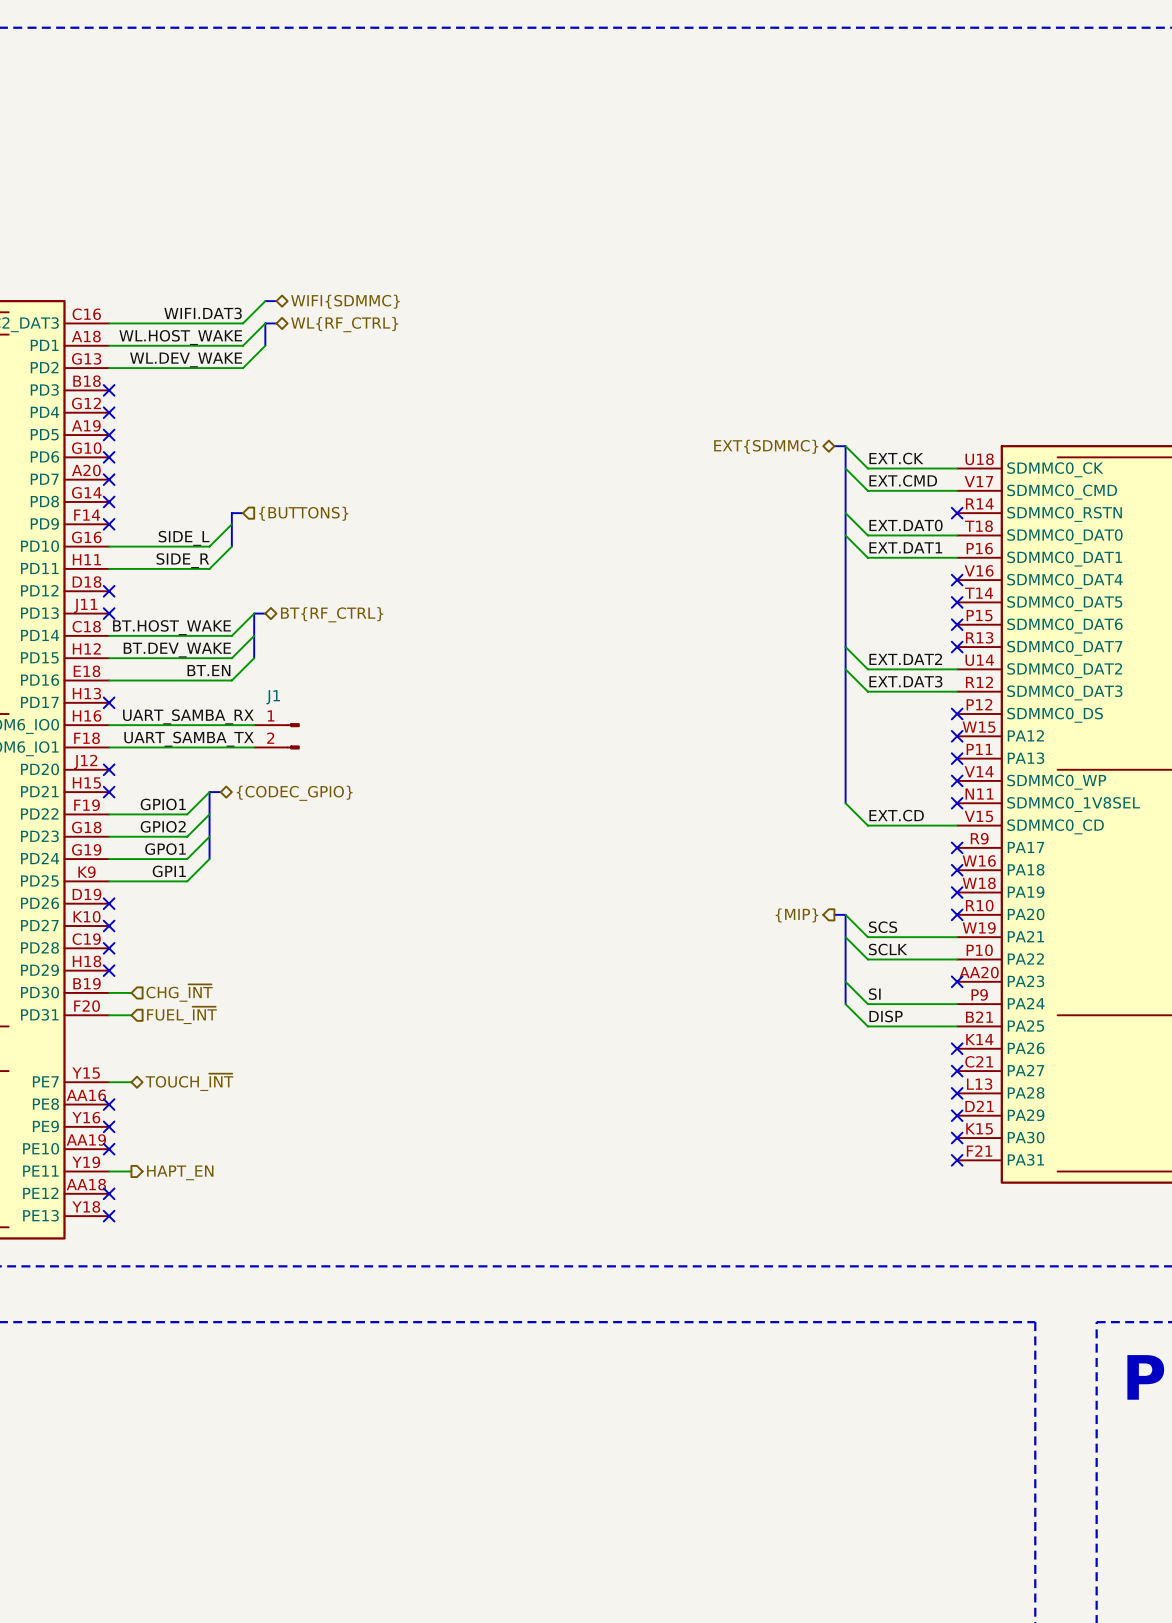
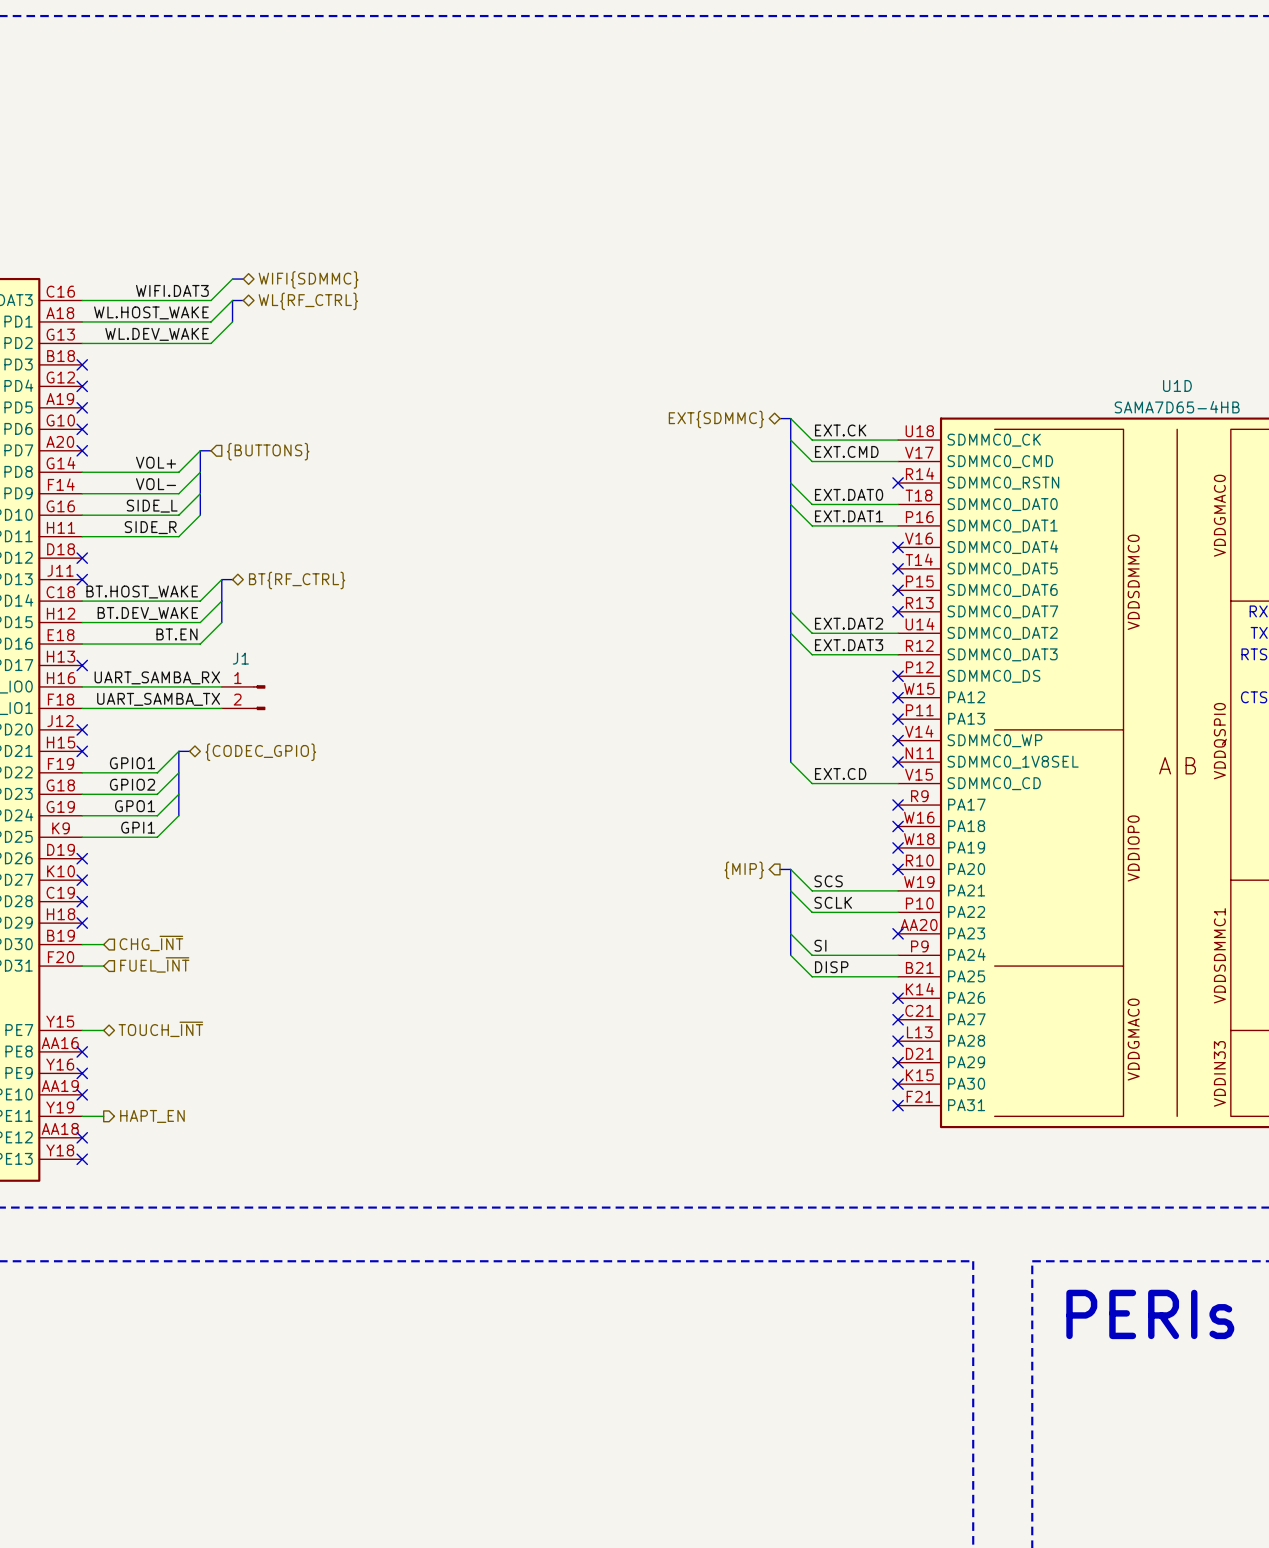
wire: none -> (200, 450) (178, 472) (82, 472)
label: none -> VOL+ (156, 462)
no-connect mark: (109, 501) -> none
wire: none -> (200, 472) (178, 493) (82, 493)
bus: (231, 513) (243, 513) -> (200, 482) (200, 450) (211, 450)
hierarchical label position: {BUTTONS} (303, 513) -> {BUTTONS} (268, 451)
label: none -> VOL- (156, 484)
no-connect mark: (109, 524) -> none

